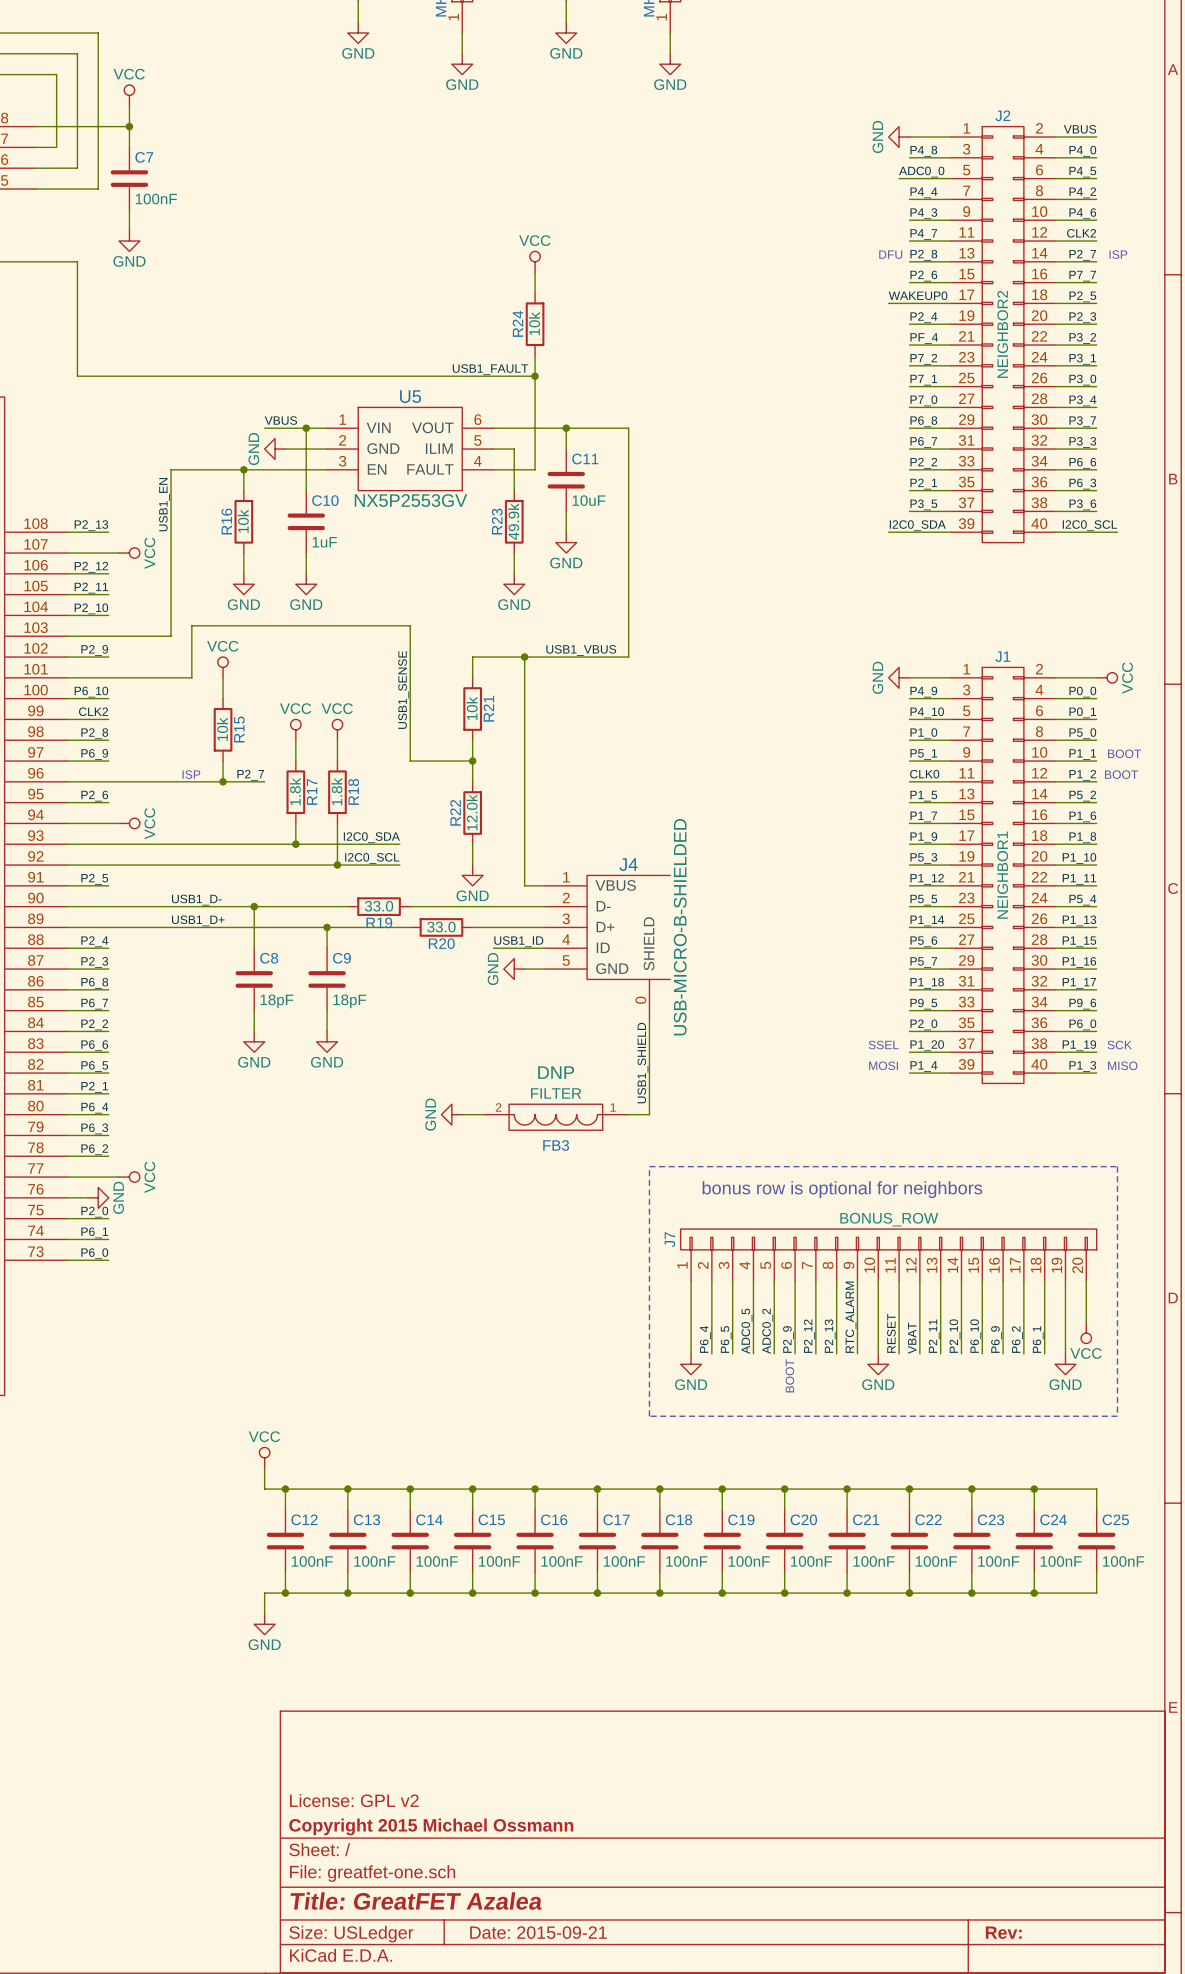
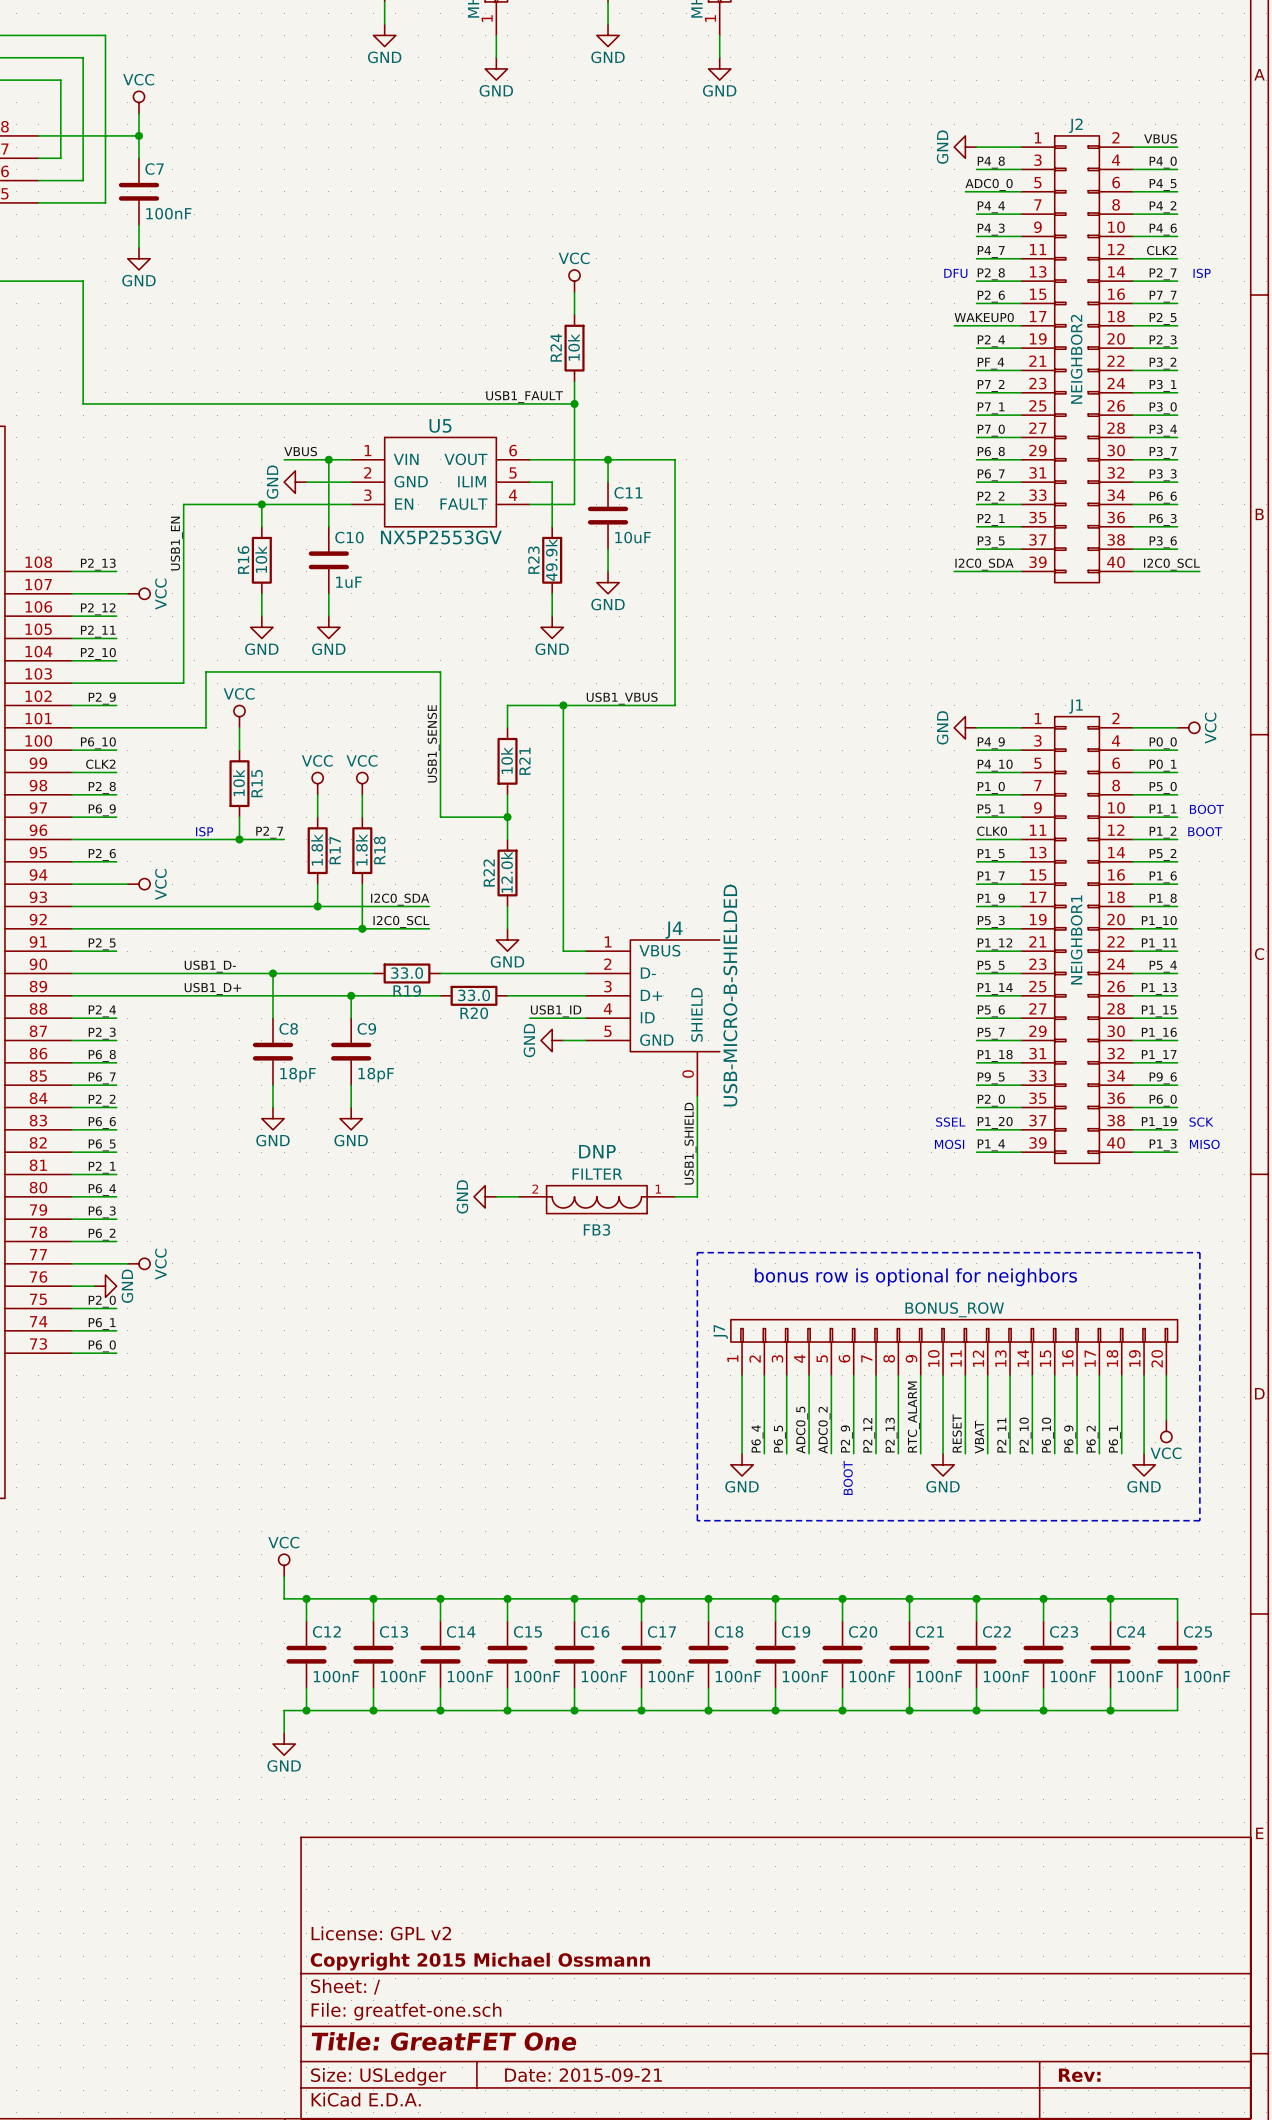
title block: Title: GreatFET Azalea (416, 1901) -> Title: GreatFET One (444, 2041)

